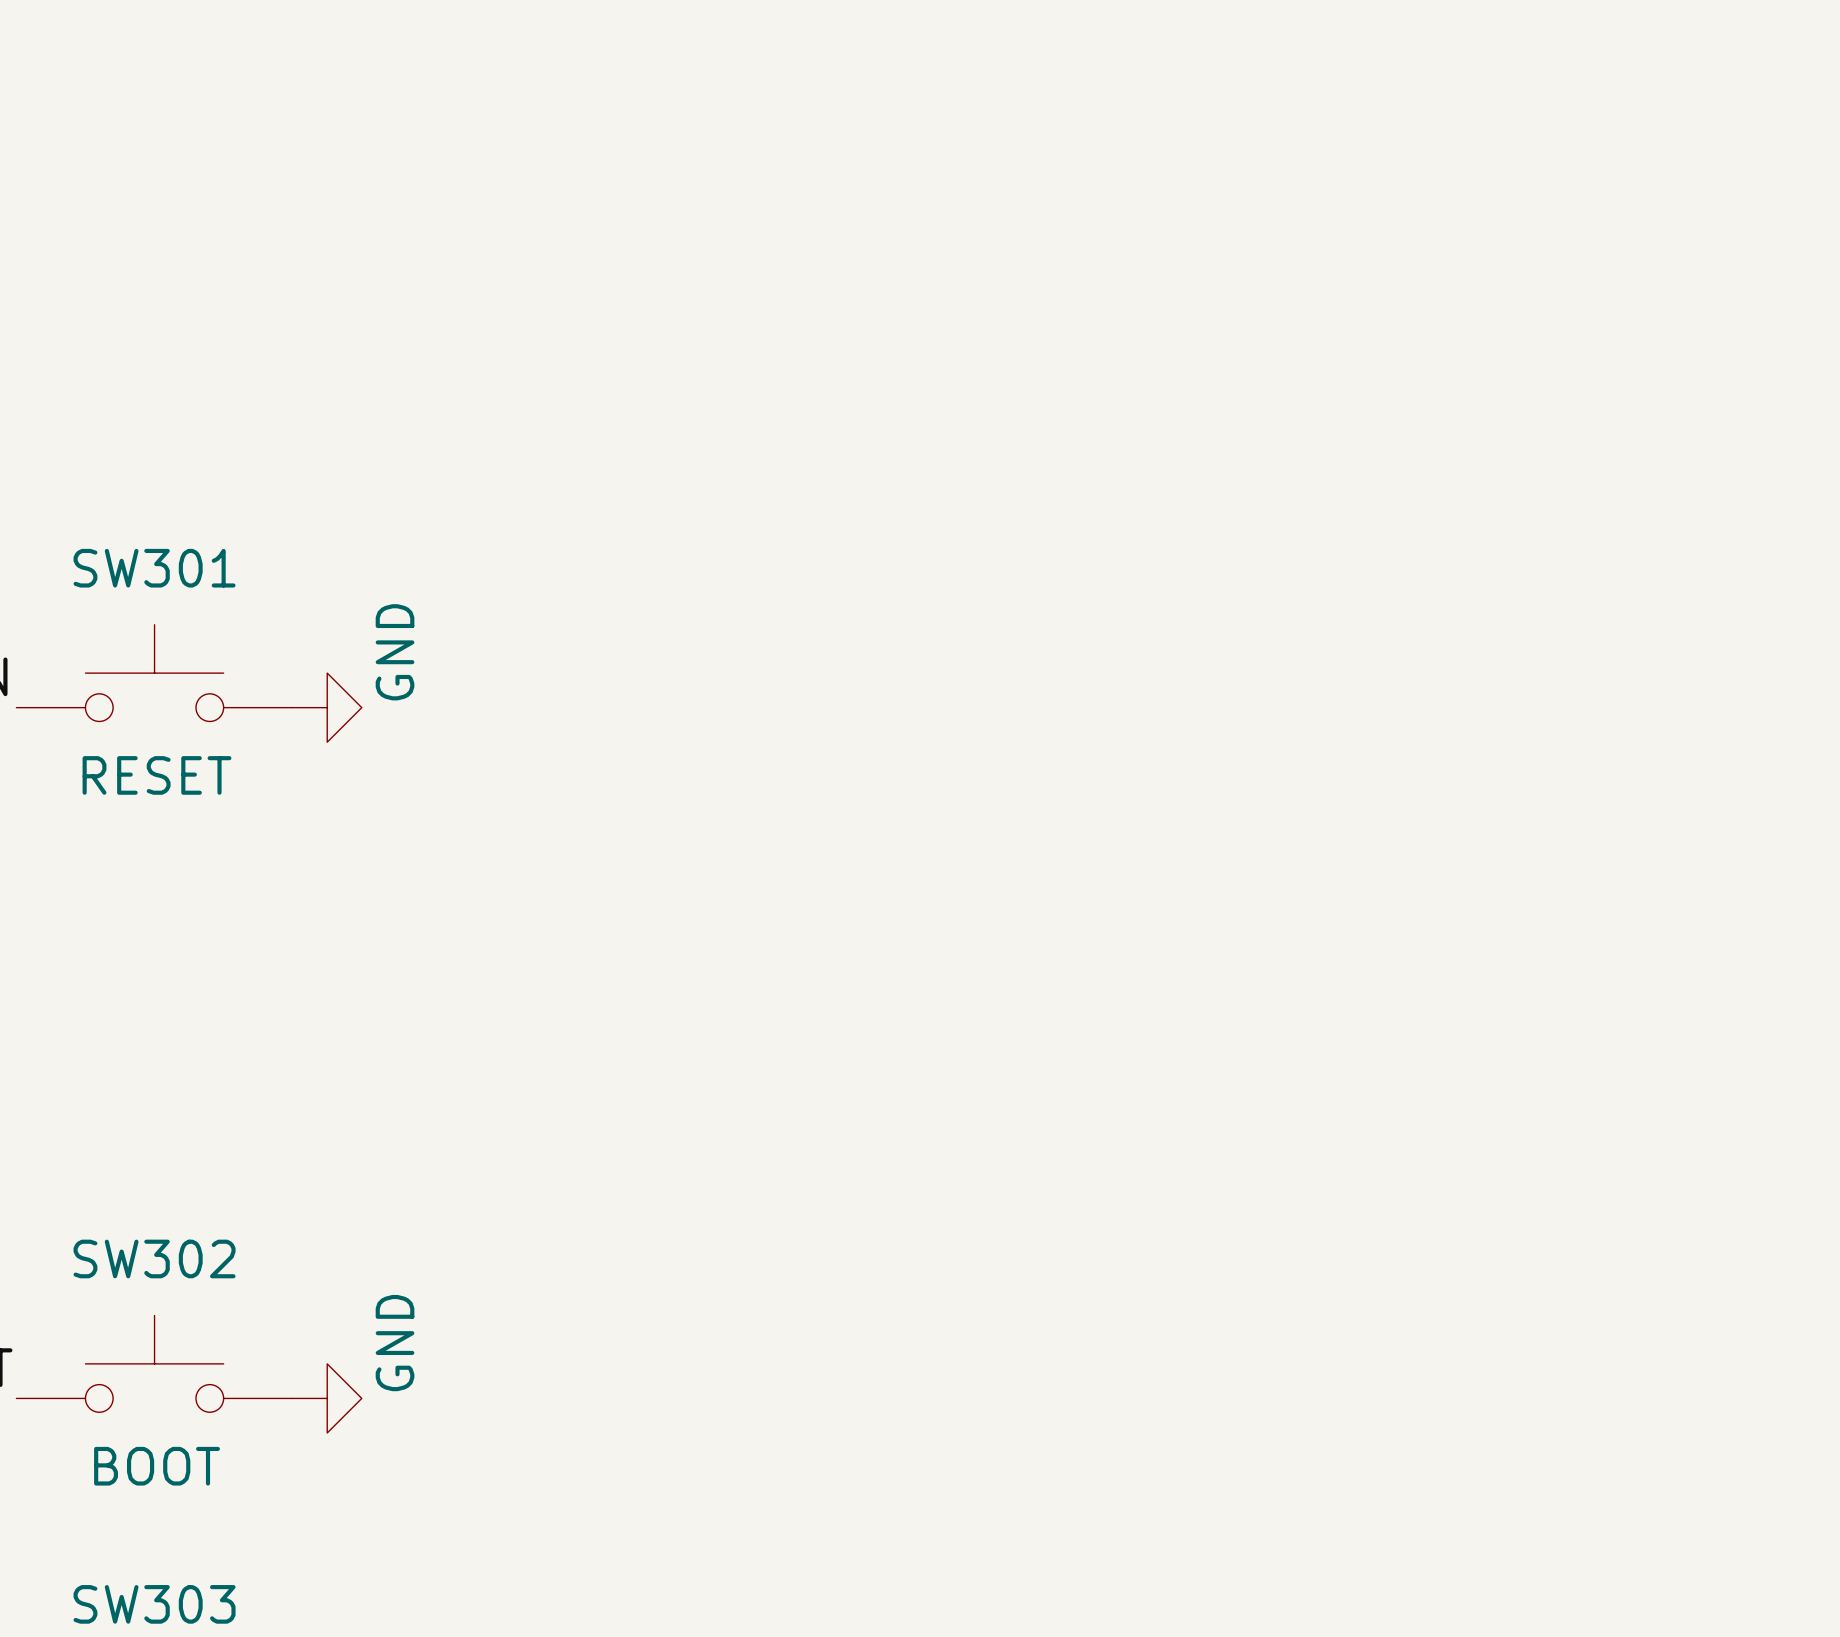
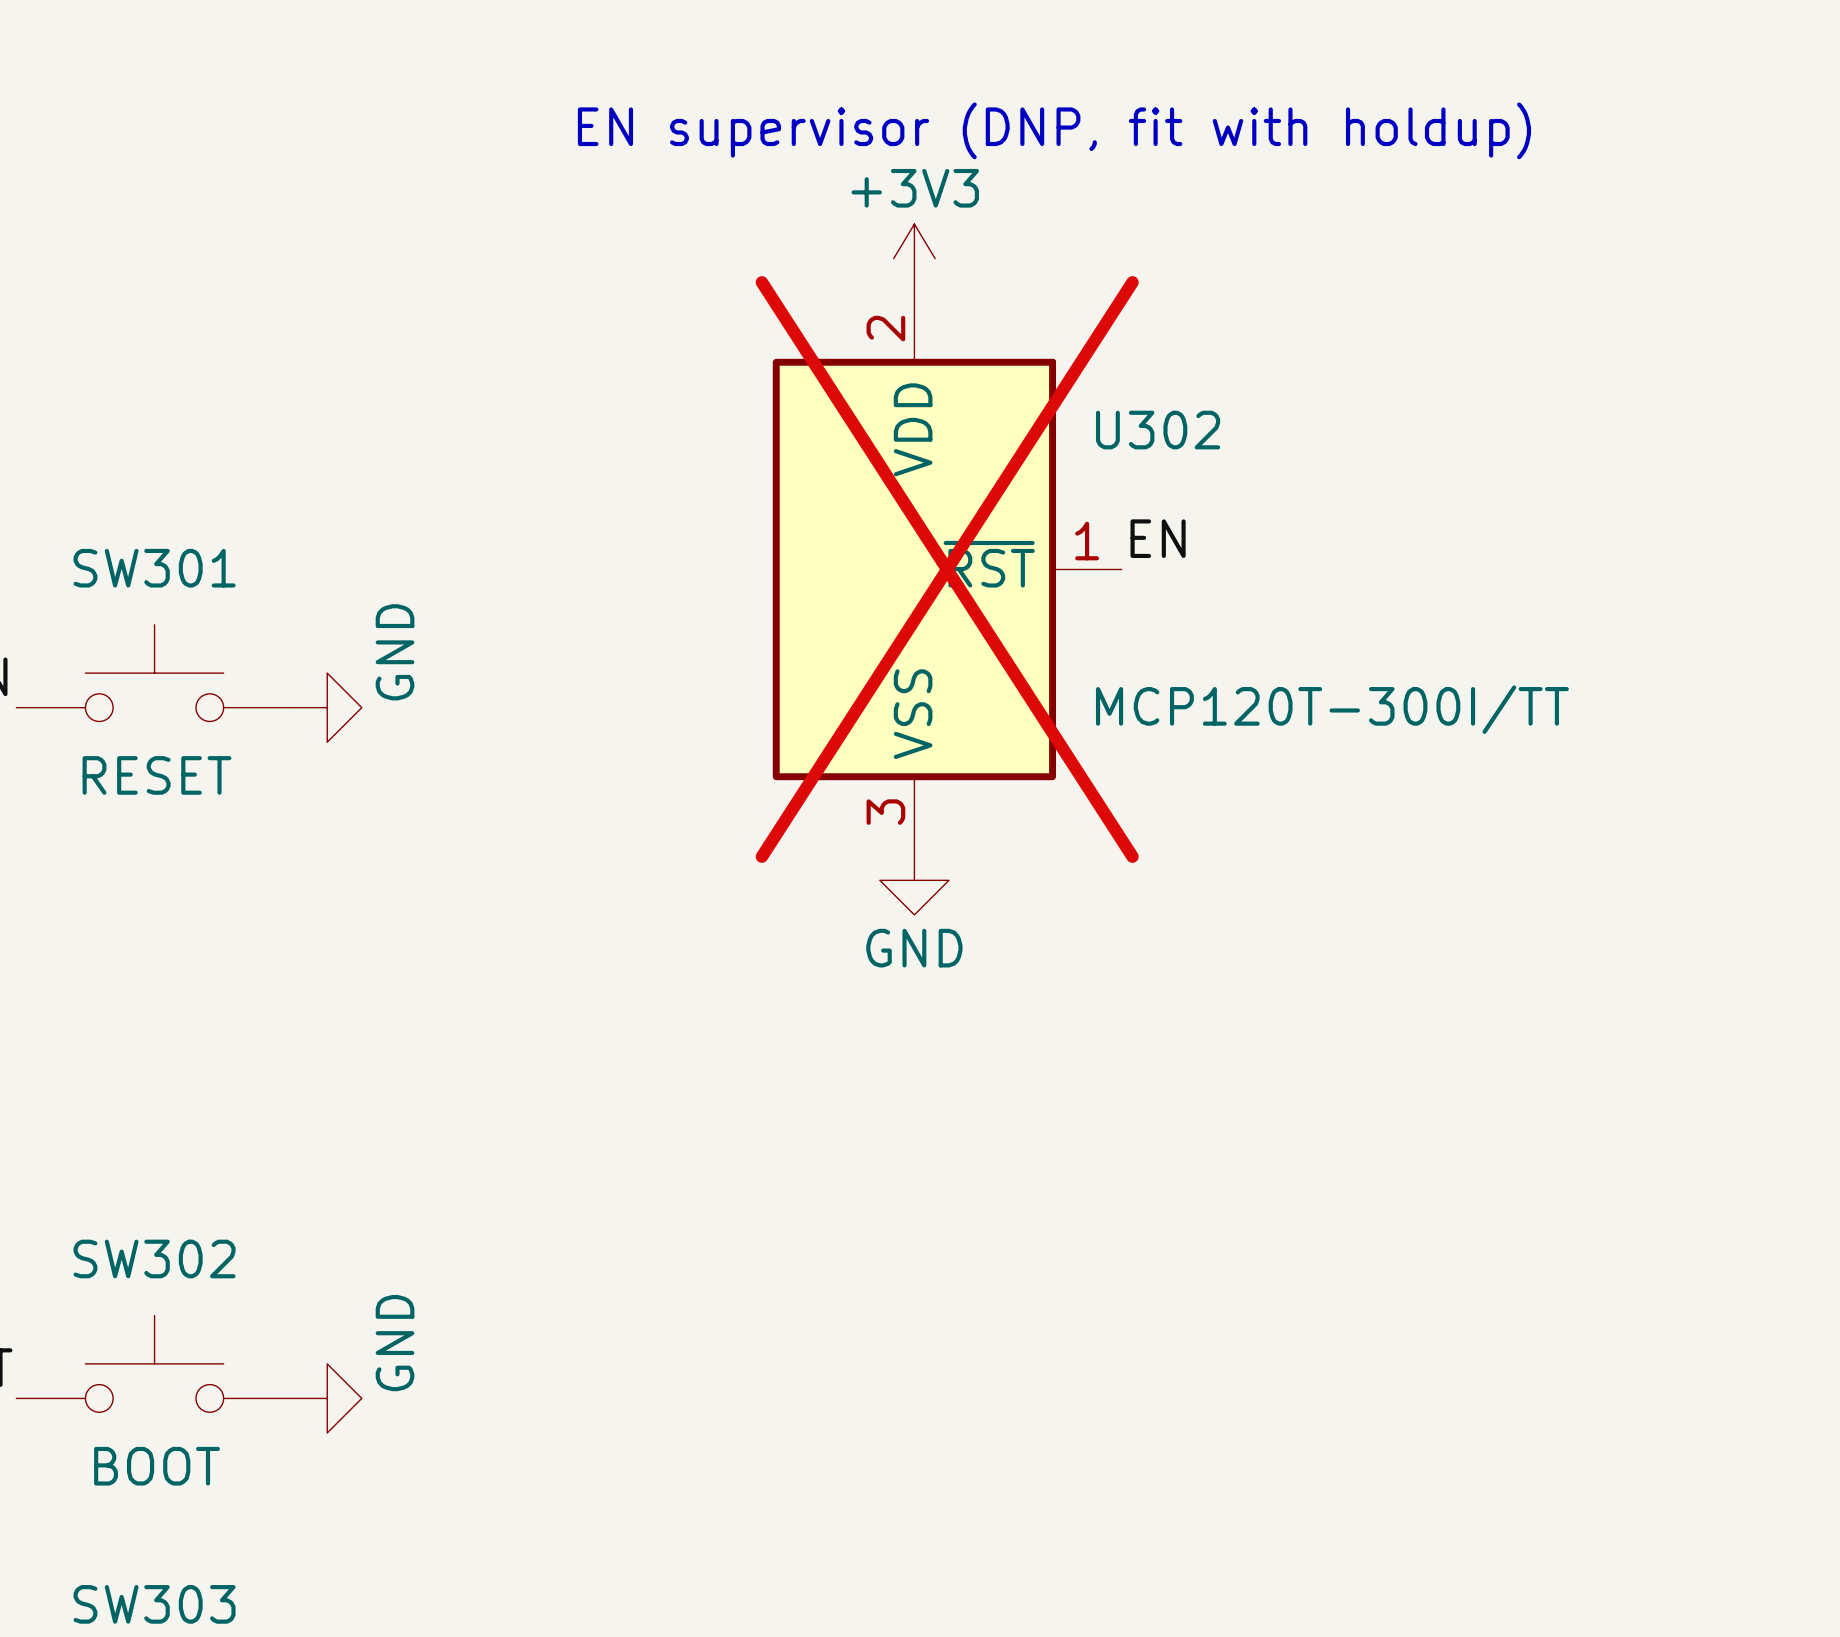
text: none -> EN supervisor (DNP, fit with holdup) (1054, 130)
power symbol: none -> +3V3 (914, 258)
label: none -> EN (1158, 538)
U302: none -> MCP120T-300I/TT (947, 569)
power symbol: none -> GND (914, 880)

